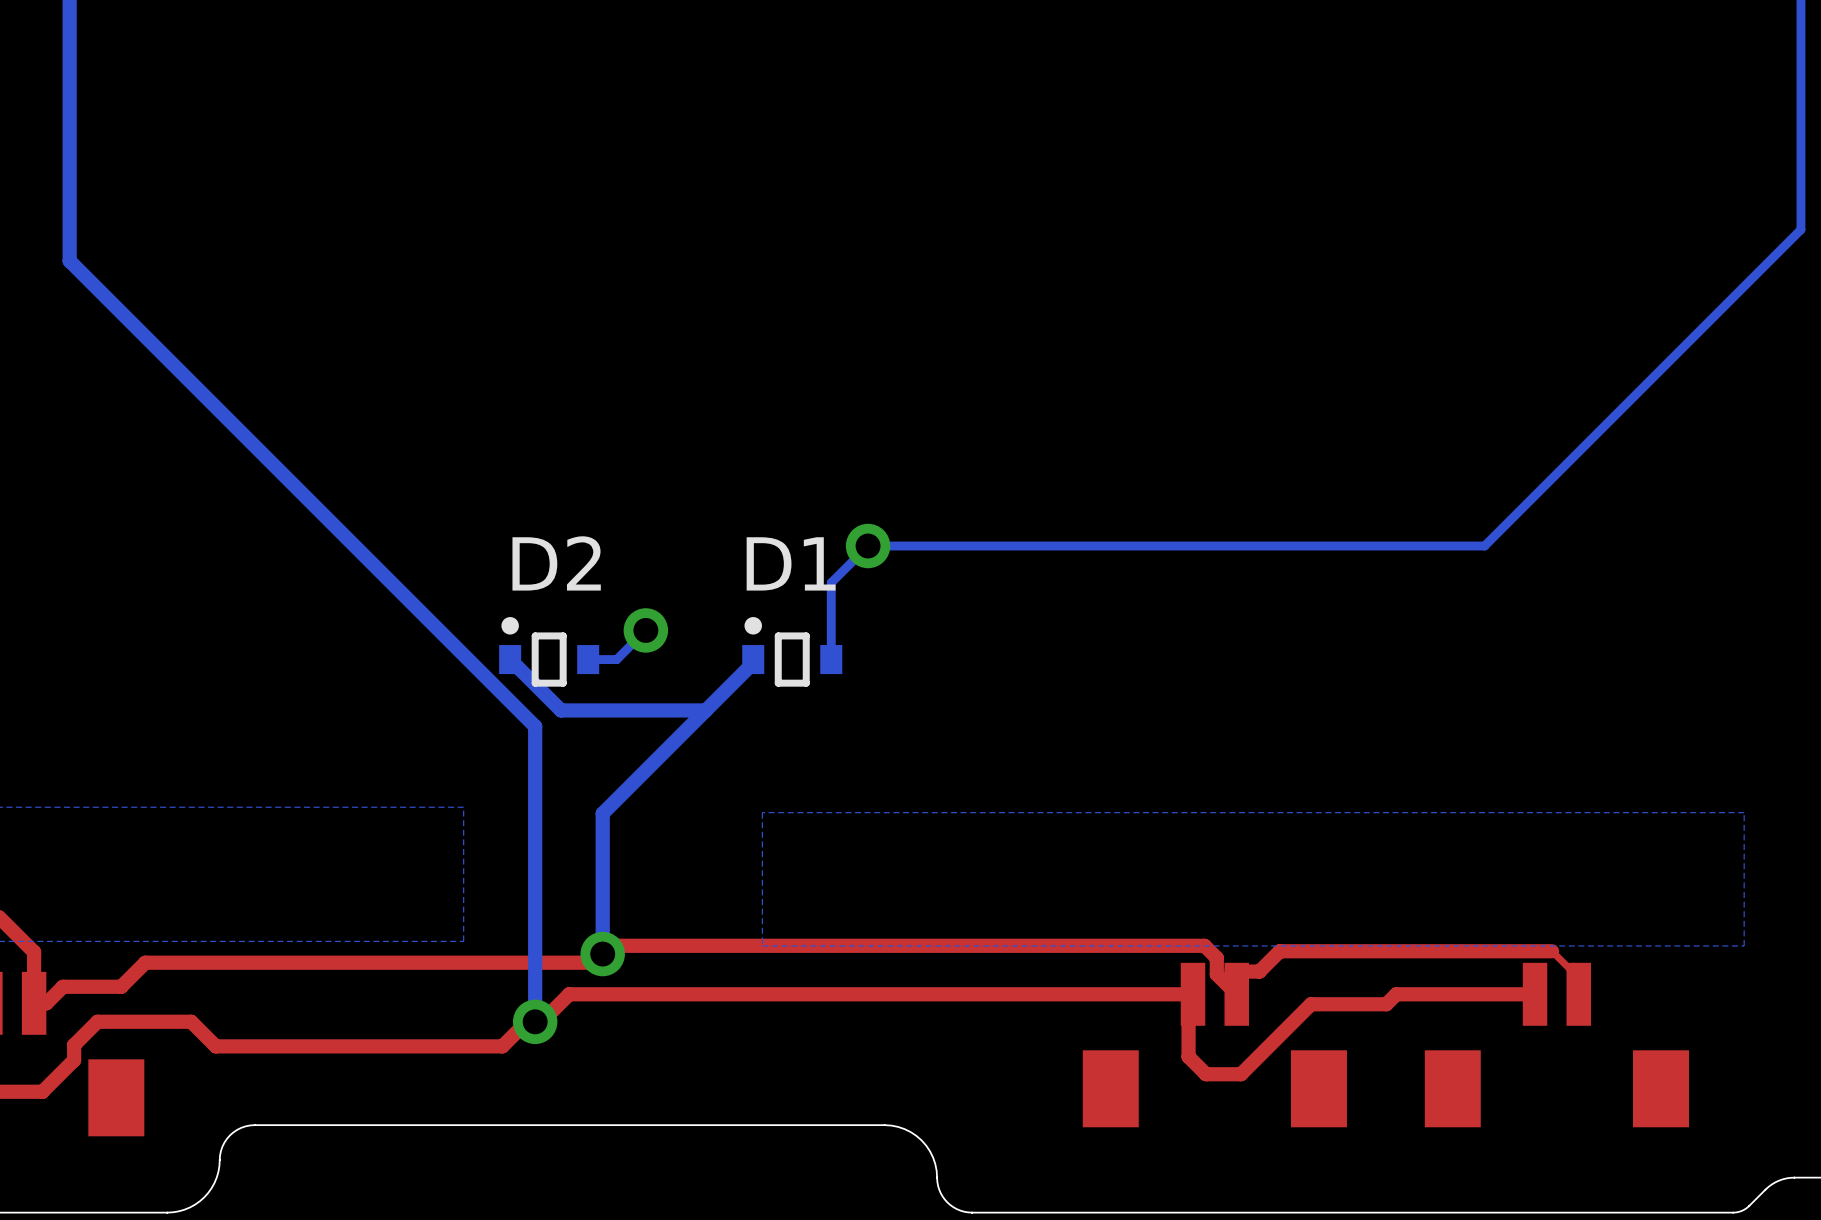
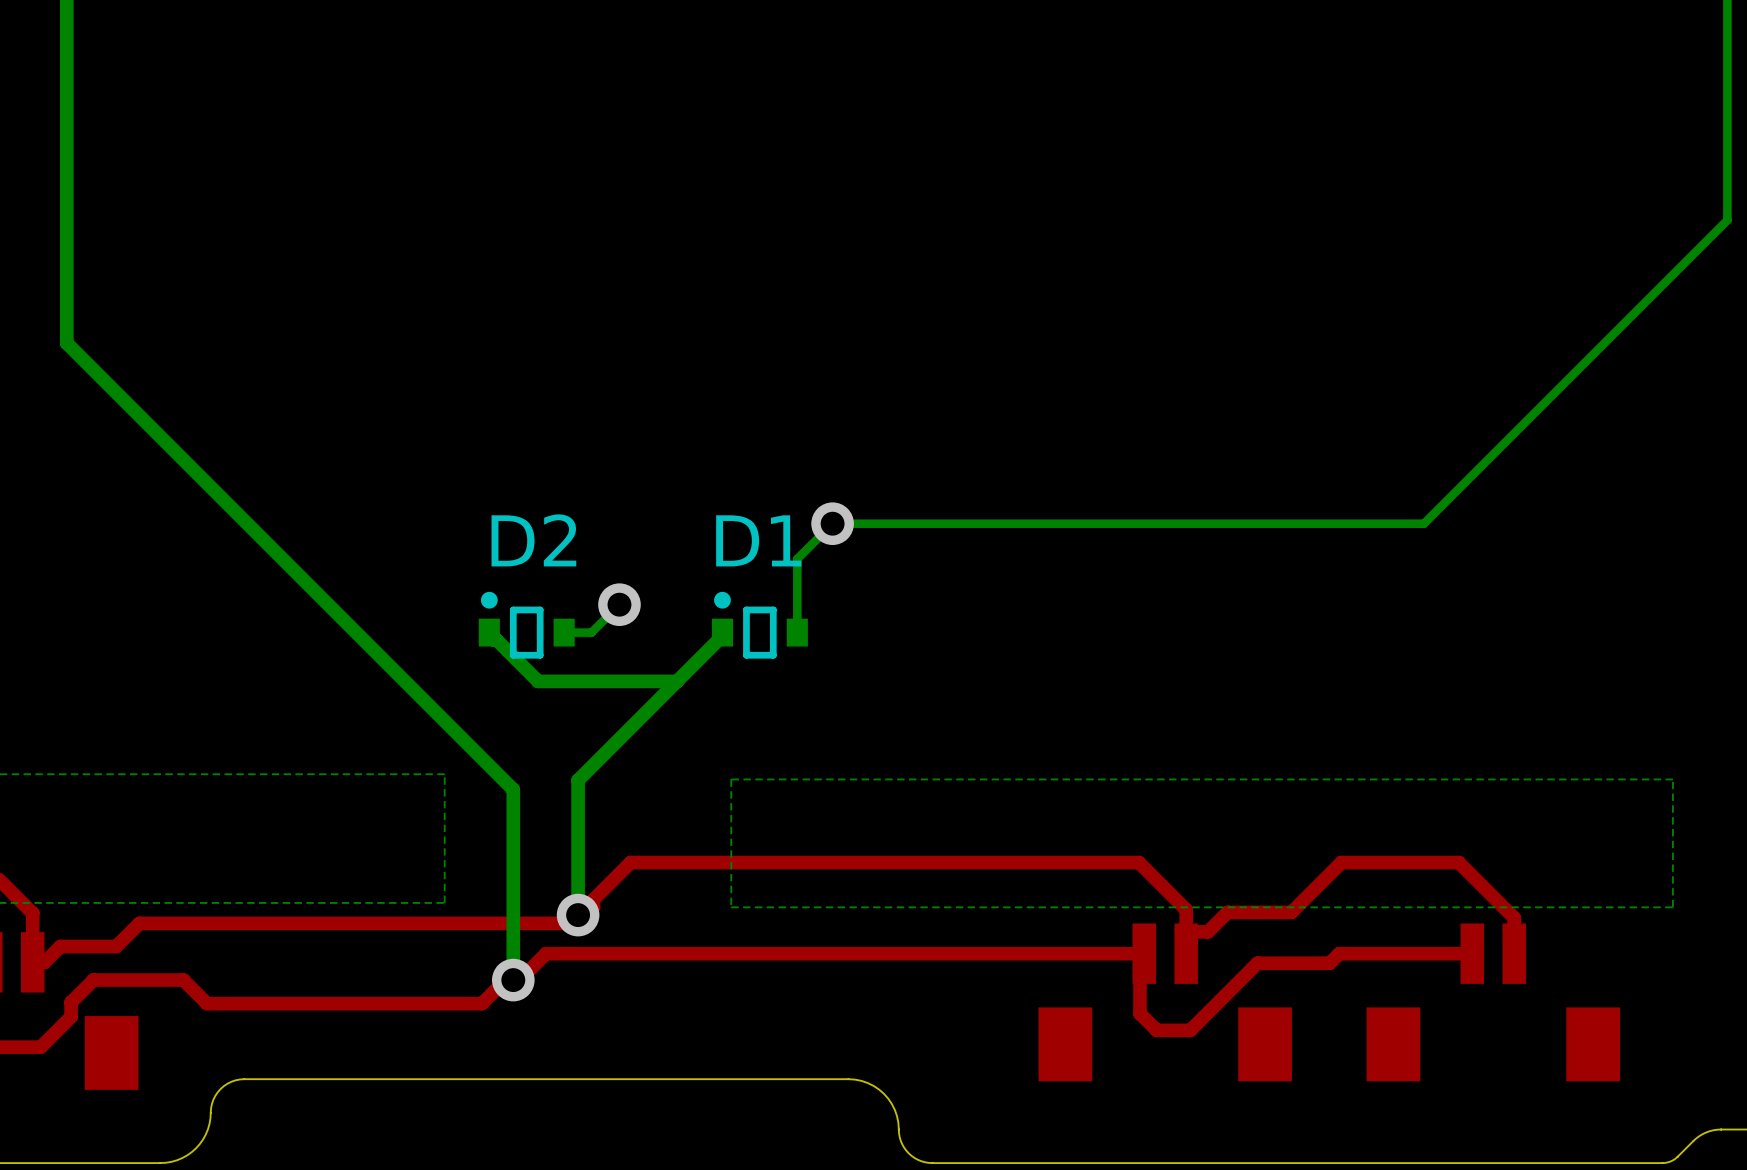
bottom track: (69, 260) (535, 726) (535, 823) -> (66, 250) (66, 343) (513, 789)
top track: (619, 945) (1204, 945) (1216, 958) (1216, 974) (1236, 994) -> none
top track: (1346, 951) (1552, 951) (1578, 977) -> (1291, 912) (1341, 862) (1458, 862) (1514, 917) (1514, 935)
top track: none -> (578, 915) (630, 862) (1138, 862) (1186, 909) (1186, 935)

